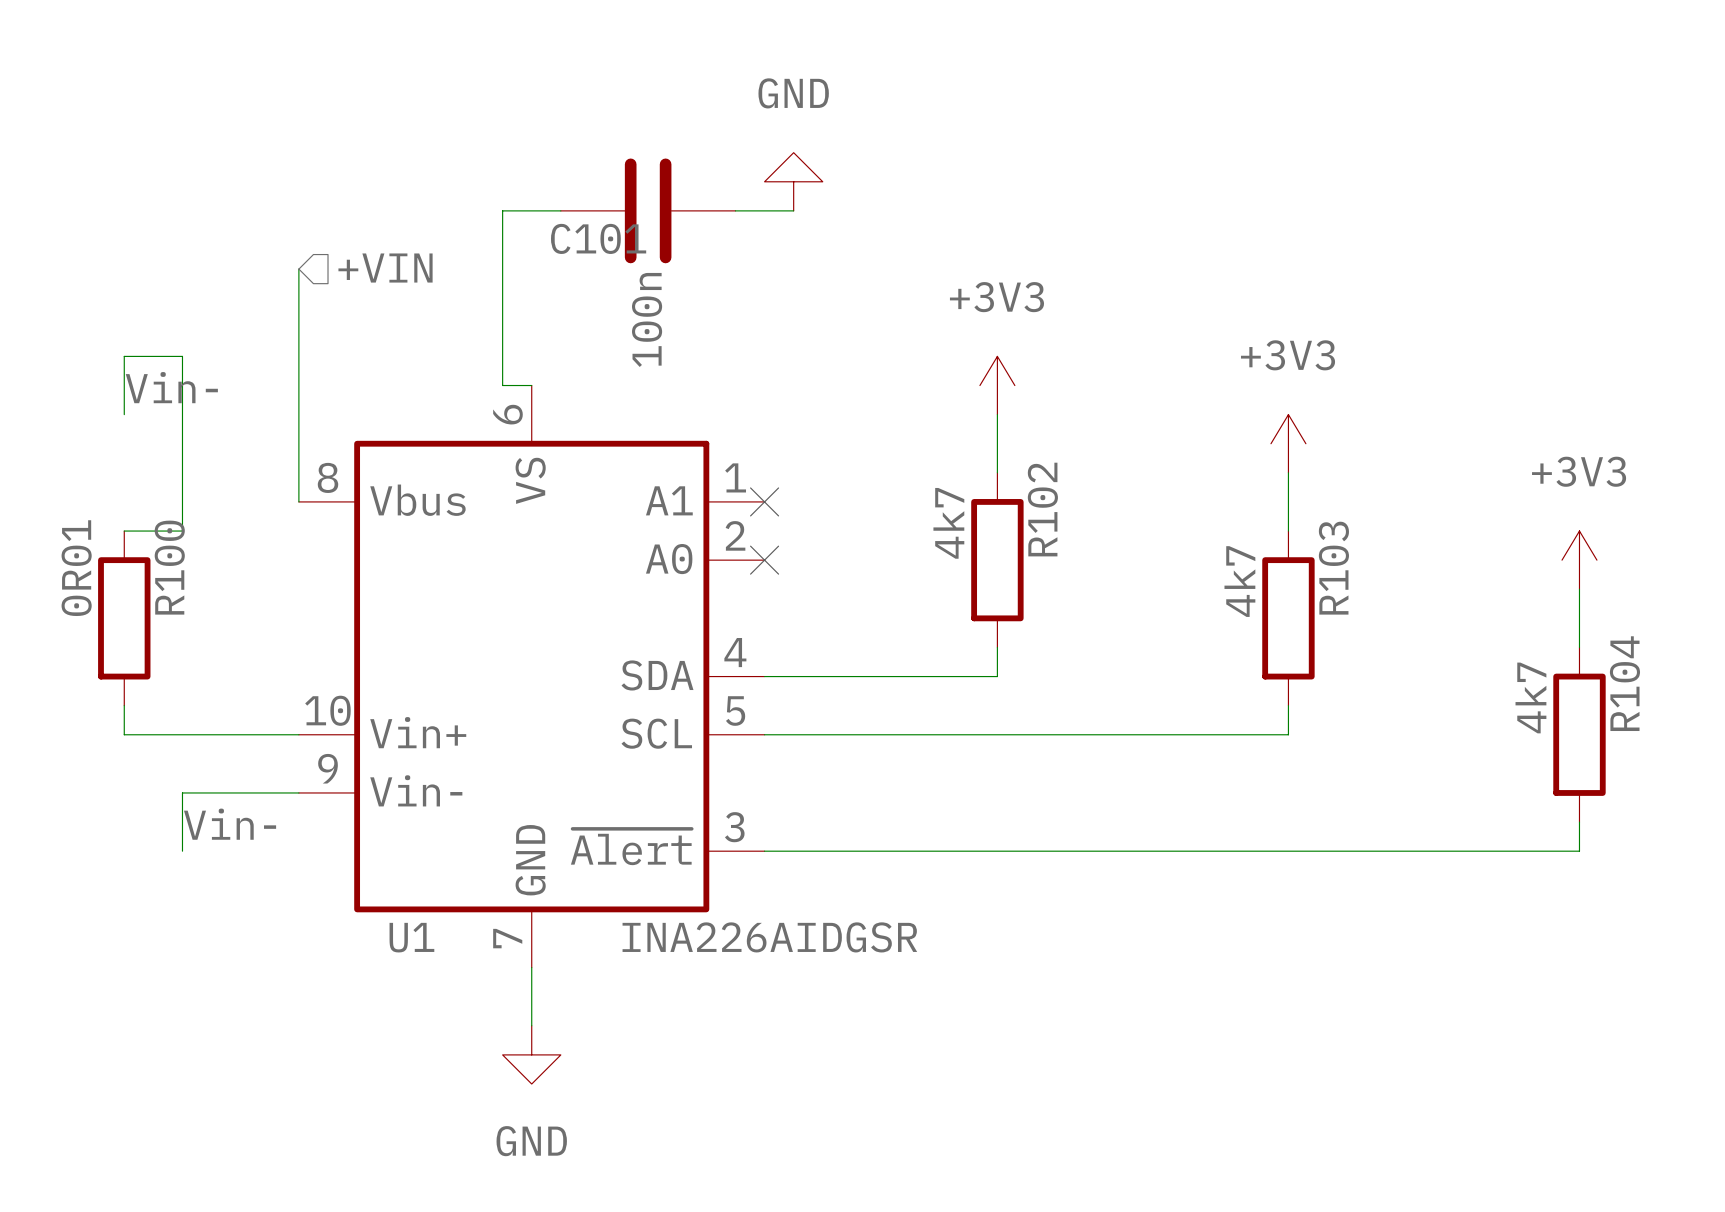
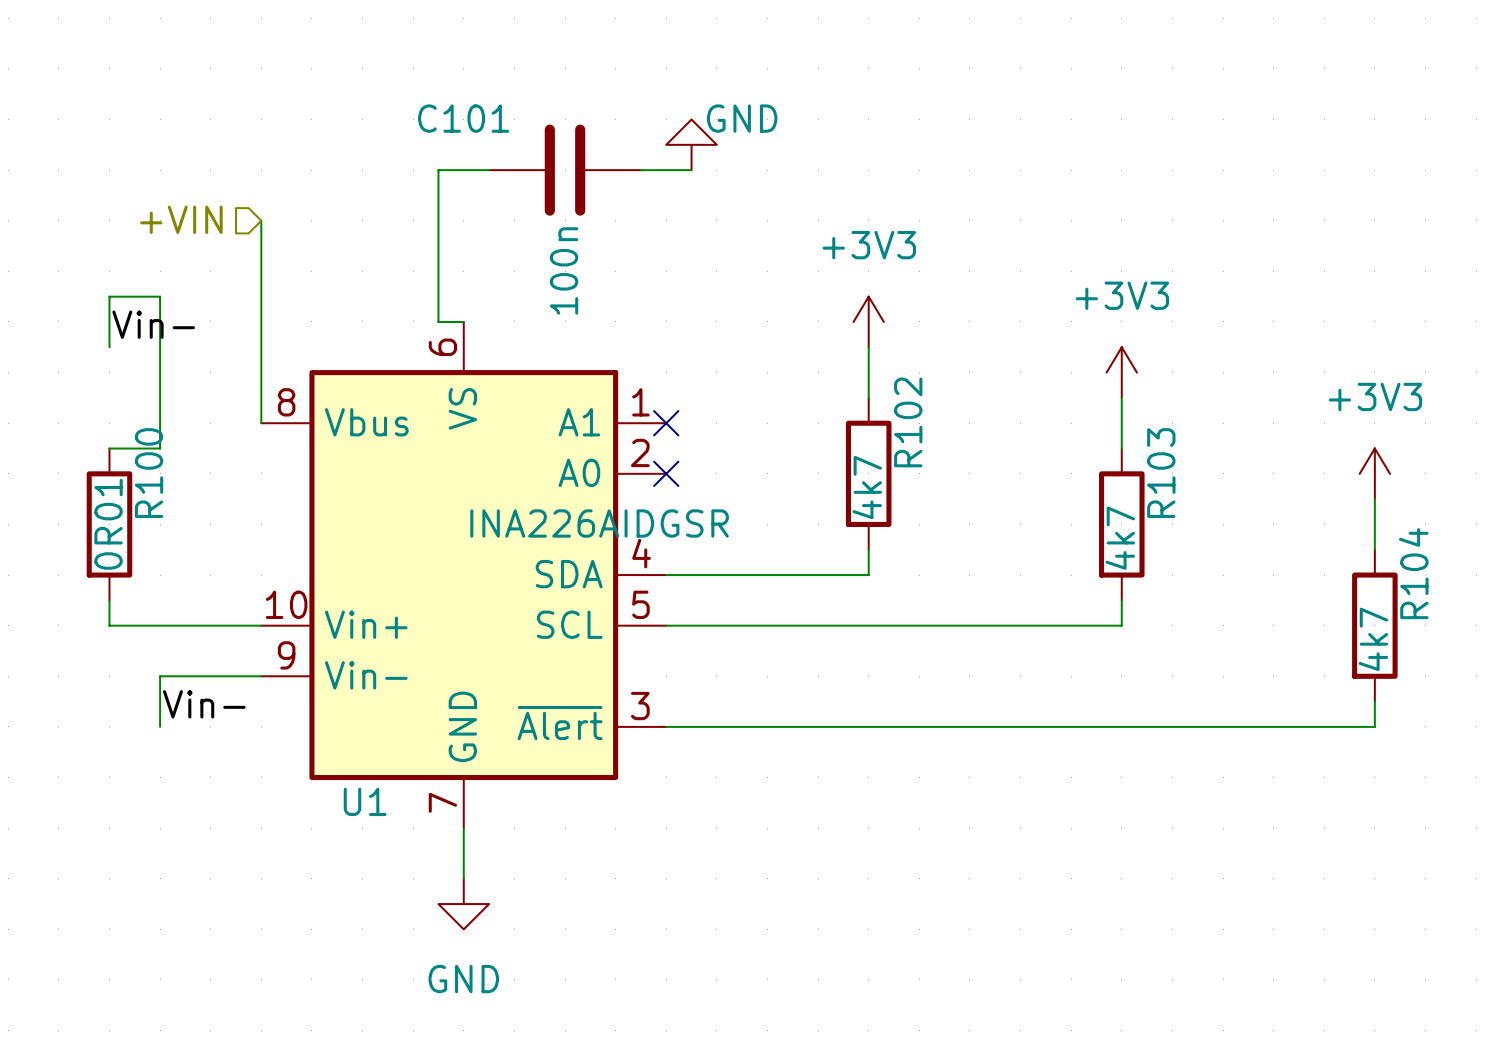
power symbol text position: GND (793, 93) -> GND (742, 118)
C101 name position: C101 (598, 238) -> C101 (463, 118)
hierarchical label rotation: 0° (385, 268) -> 180° (181, 219)
hierarchical label position: +VIN (385, 268) -> +VIN (181, 219)
R102 value position: 4k7 (948, 523) -> 4k7 (867, 487)
R100 value position: 0R01 (76, 568) -> 0R01 (108, 524)
R103 value position: 4k7 (1239, 581) -> 4k7 (1120, 538)
R104 value position: 4k7 (1530, 697) -> 4k7 (1373, 639)
U1 value position: INA226AIDGSR (769, 937) -> INA226AIDGSR (599, 523)

